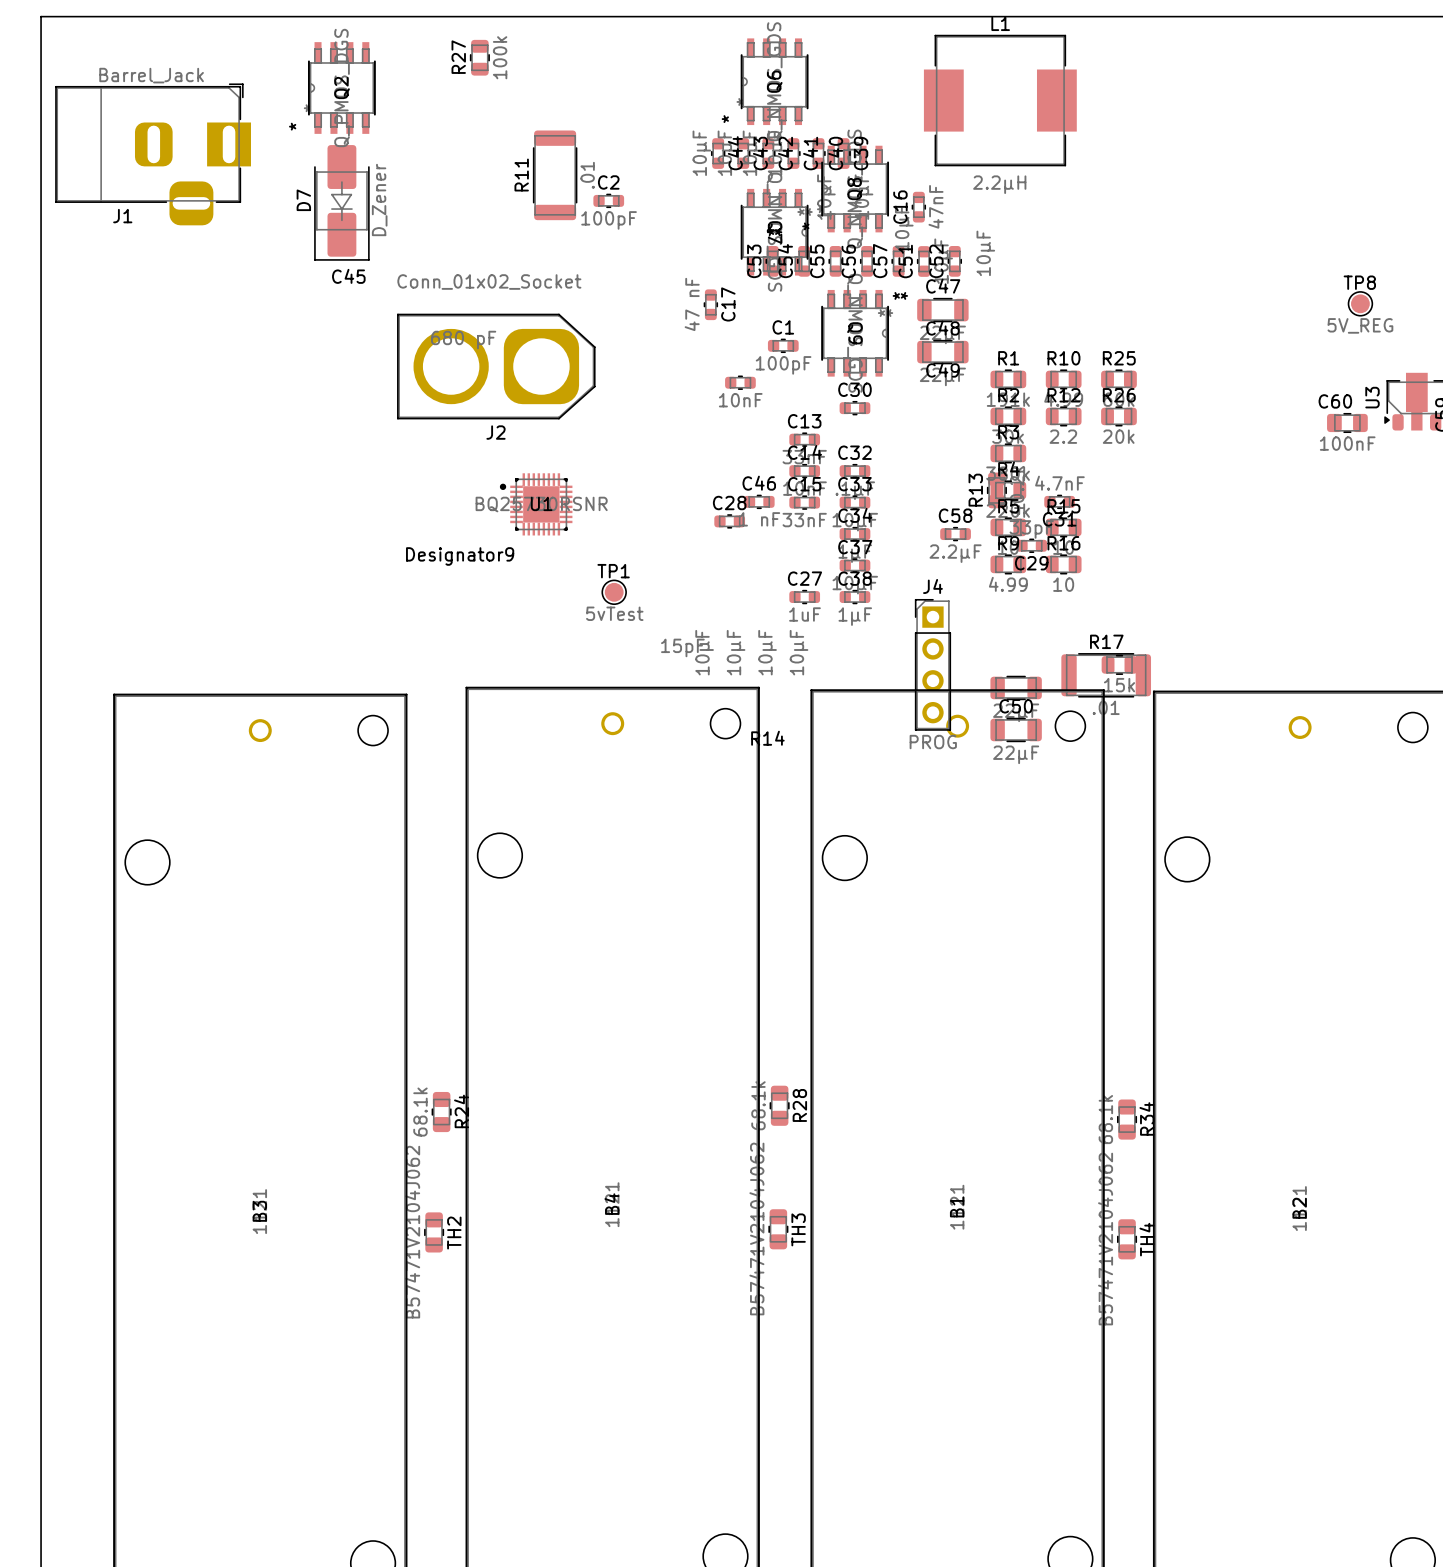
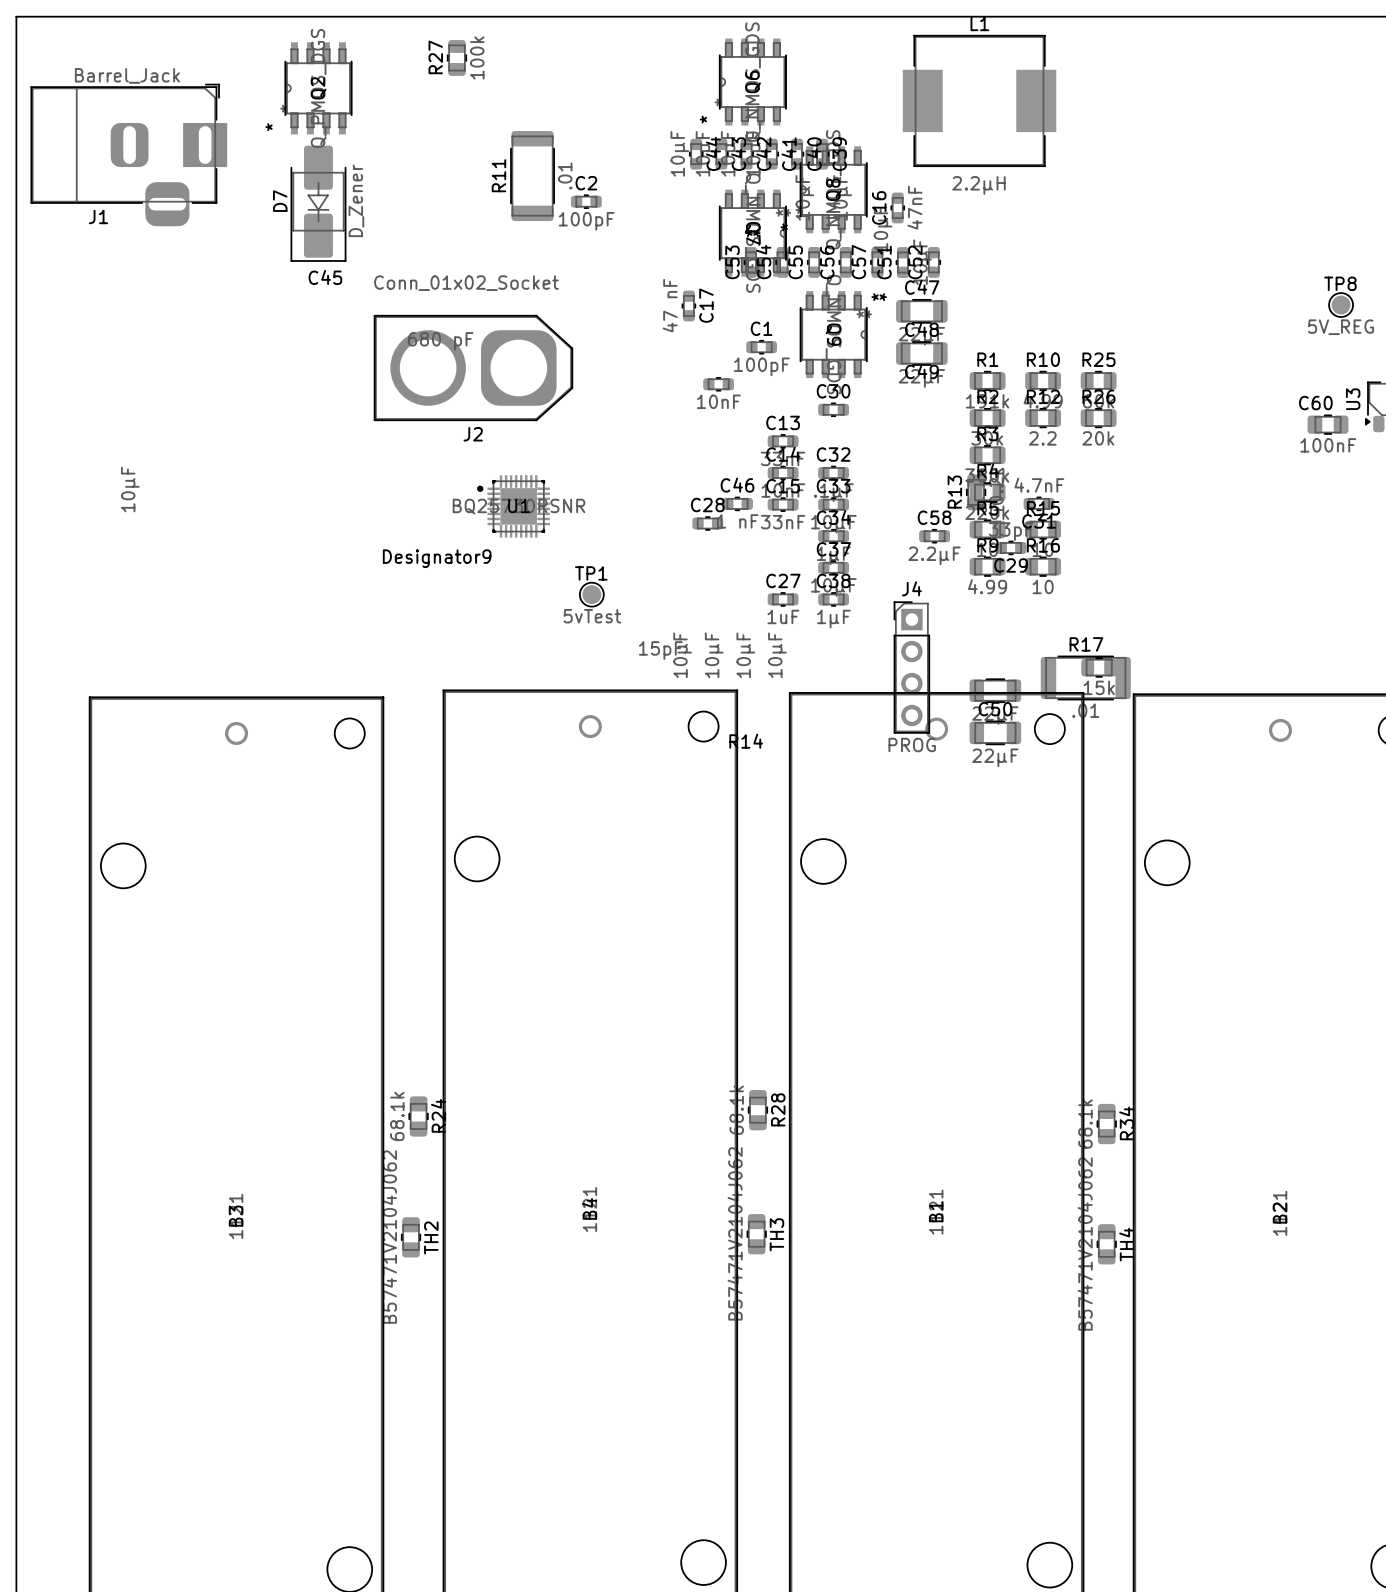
C52 value position: 10µF (985, 253) -> 10µF (130, 489)

